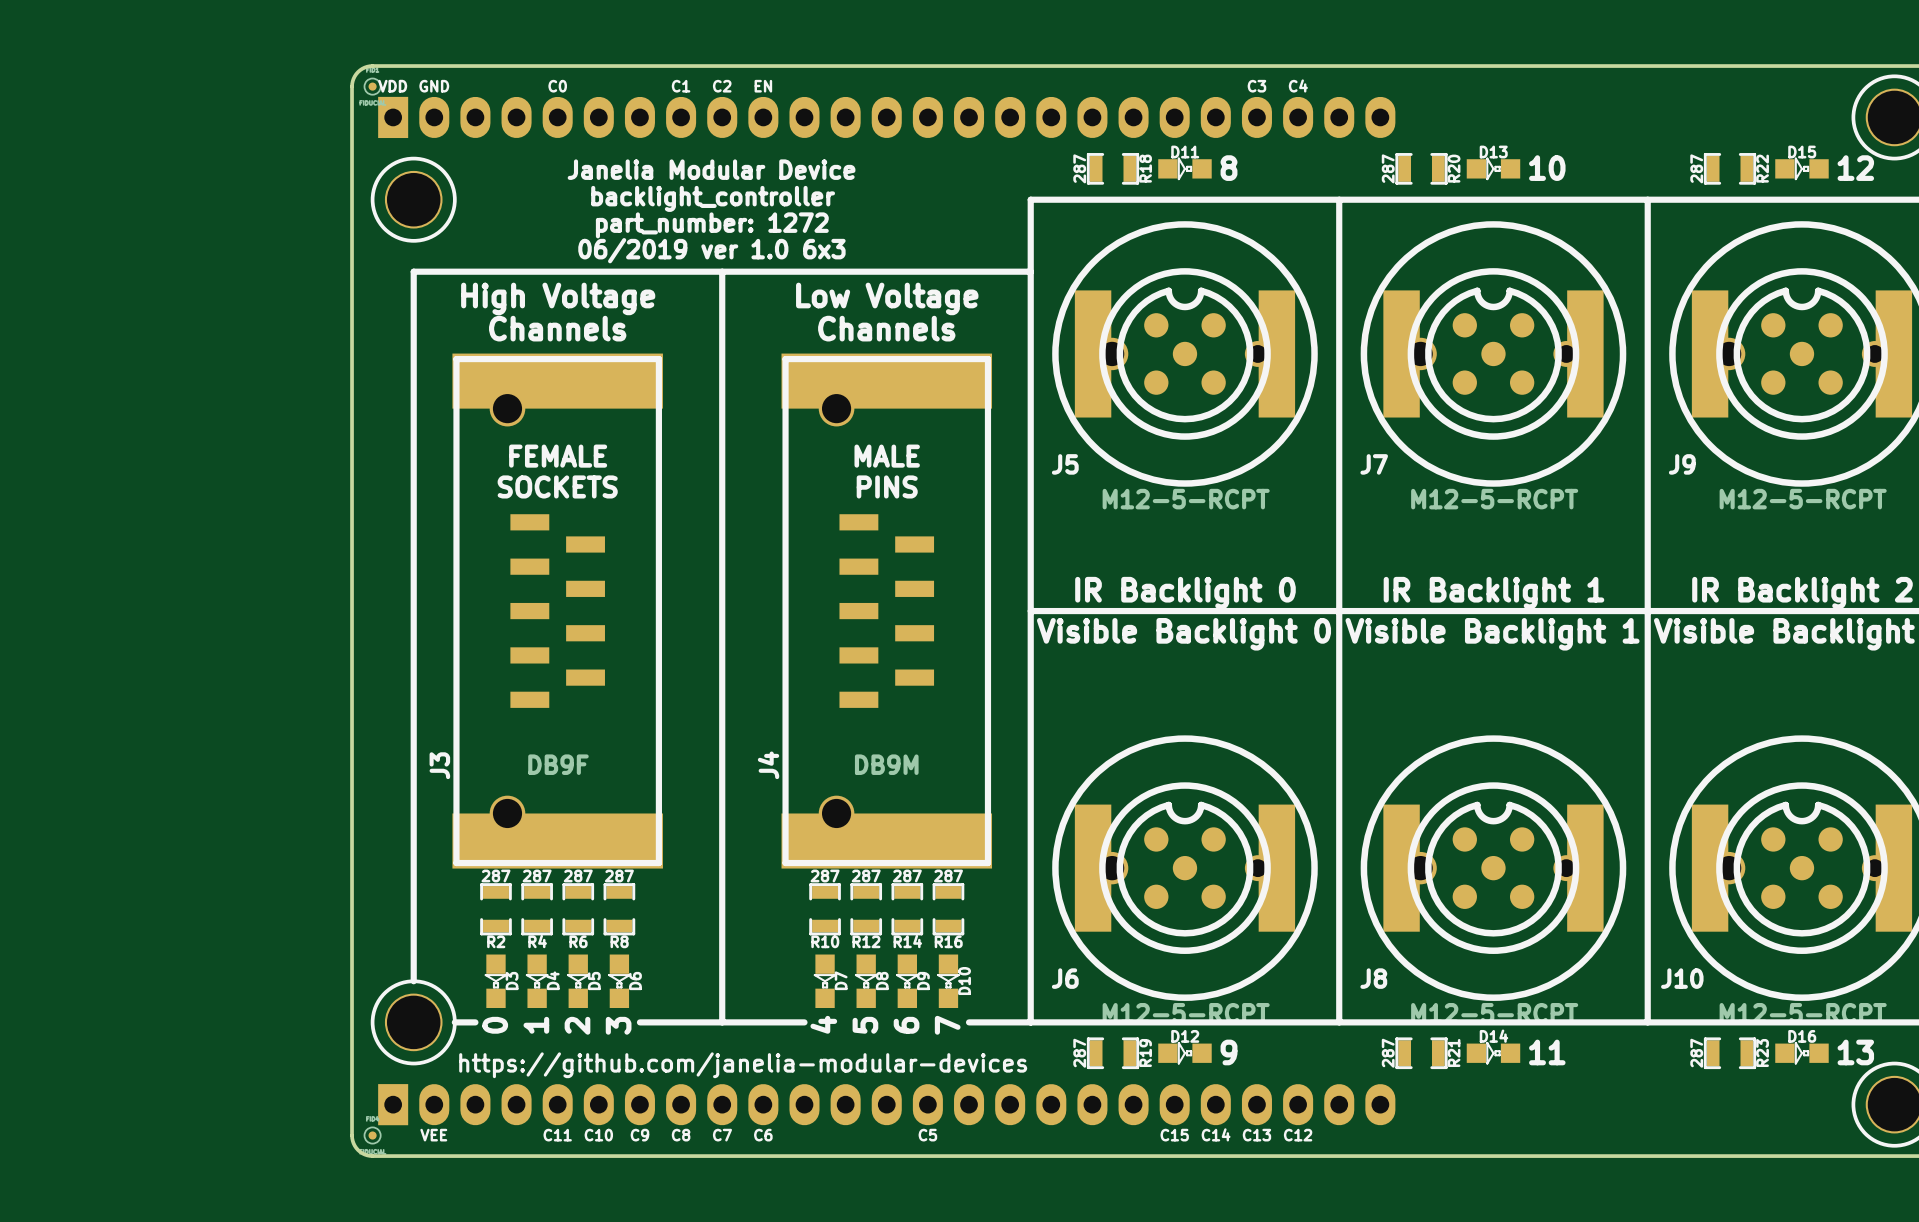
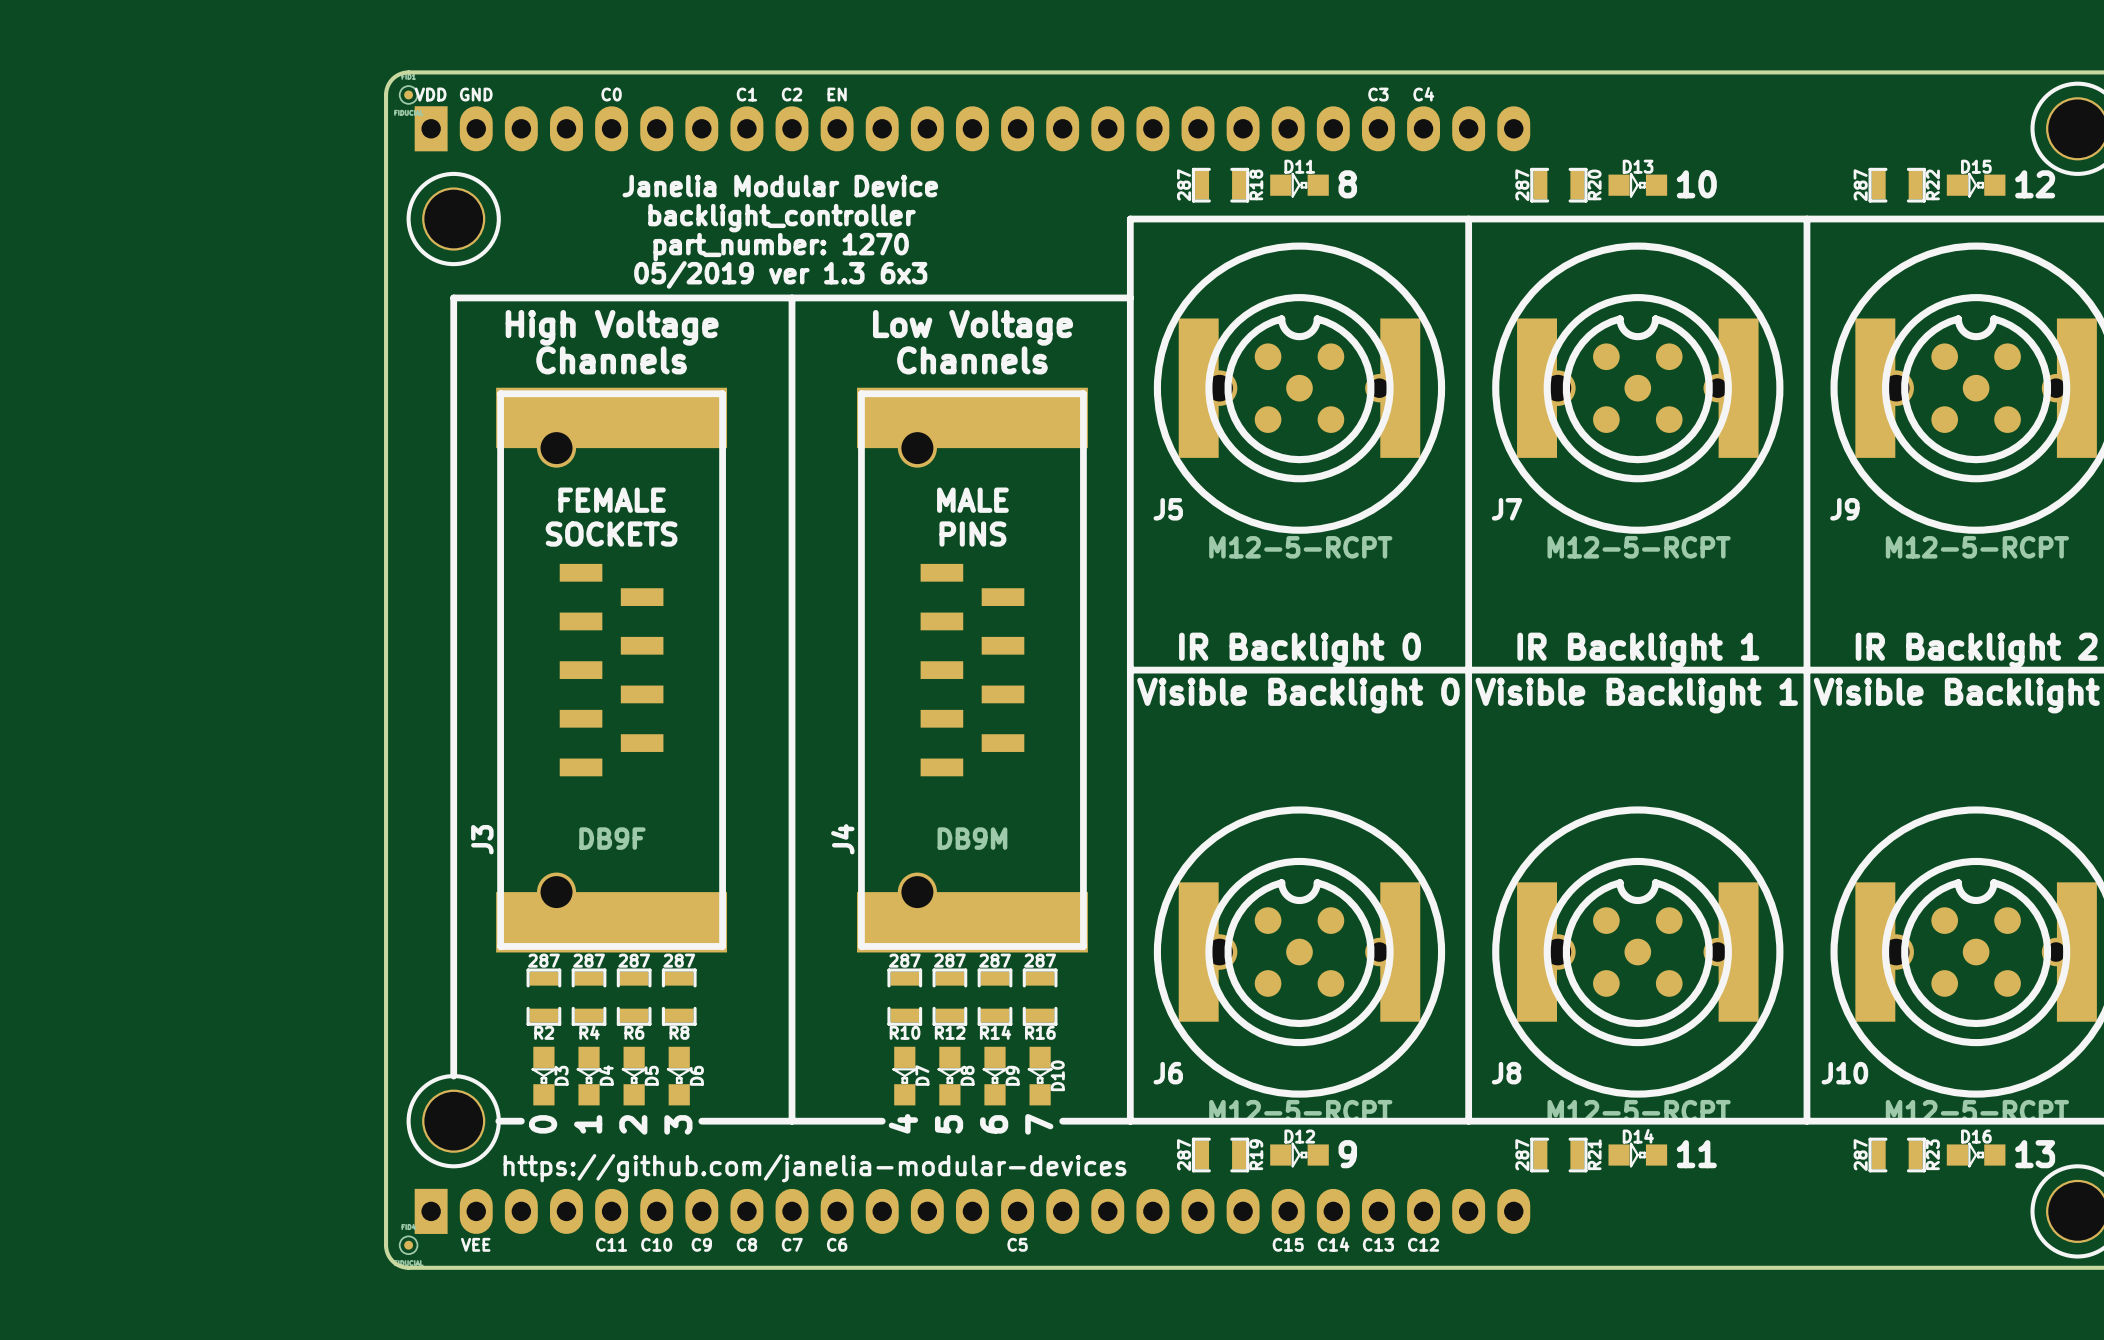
text: part_number: 1272 (712, 225) -> part_number: 1270 (781, 247)
text: 06/2019 ver 1.0 6x3 (711, 250) -> 05/2019 ver 1.3 6x3 (780, 274)

